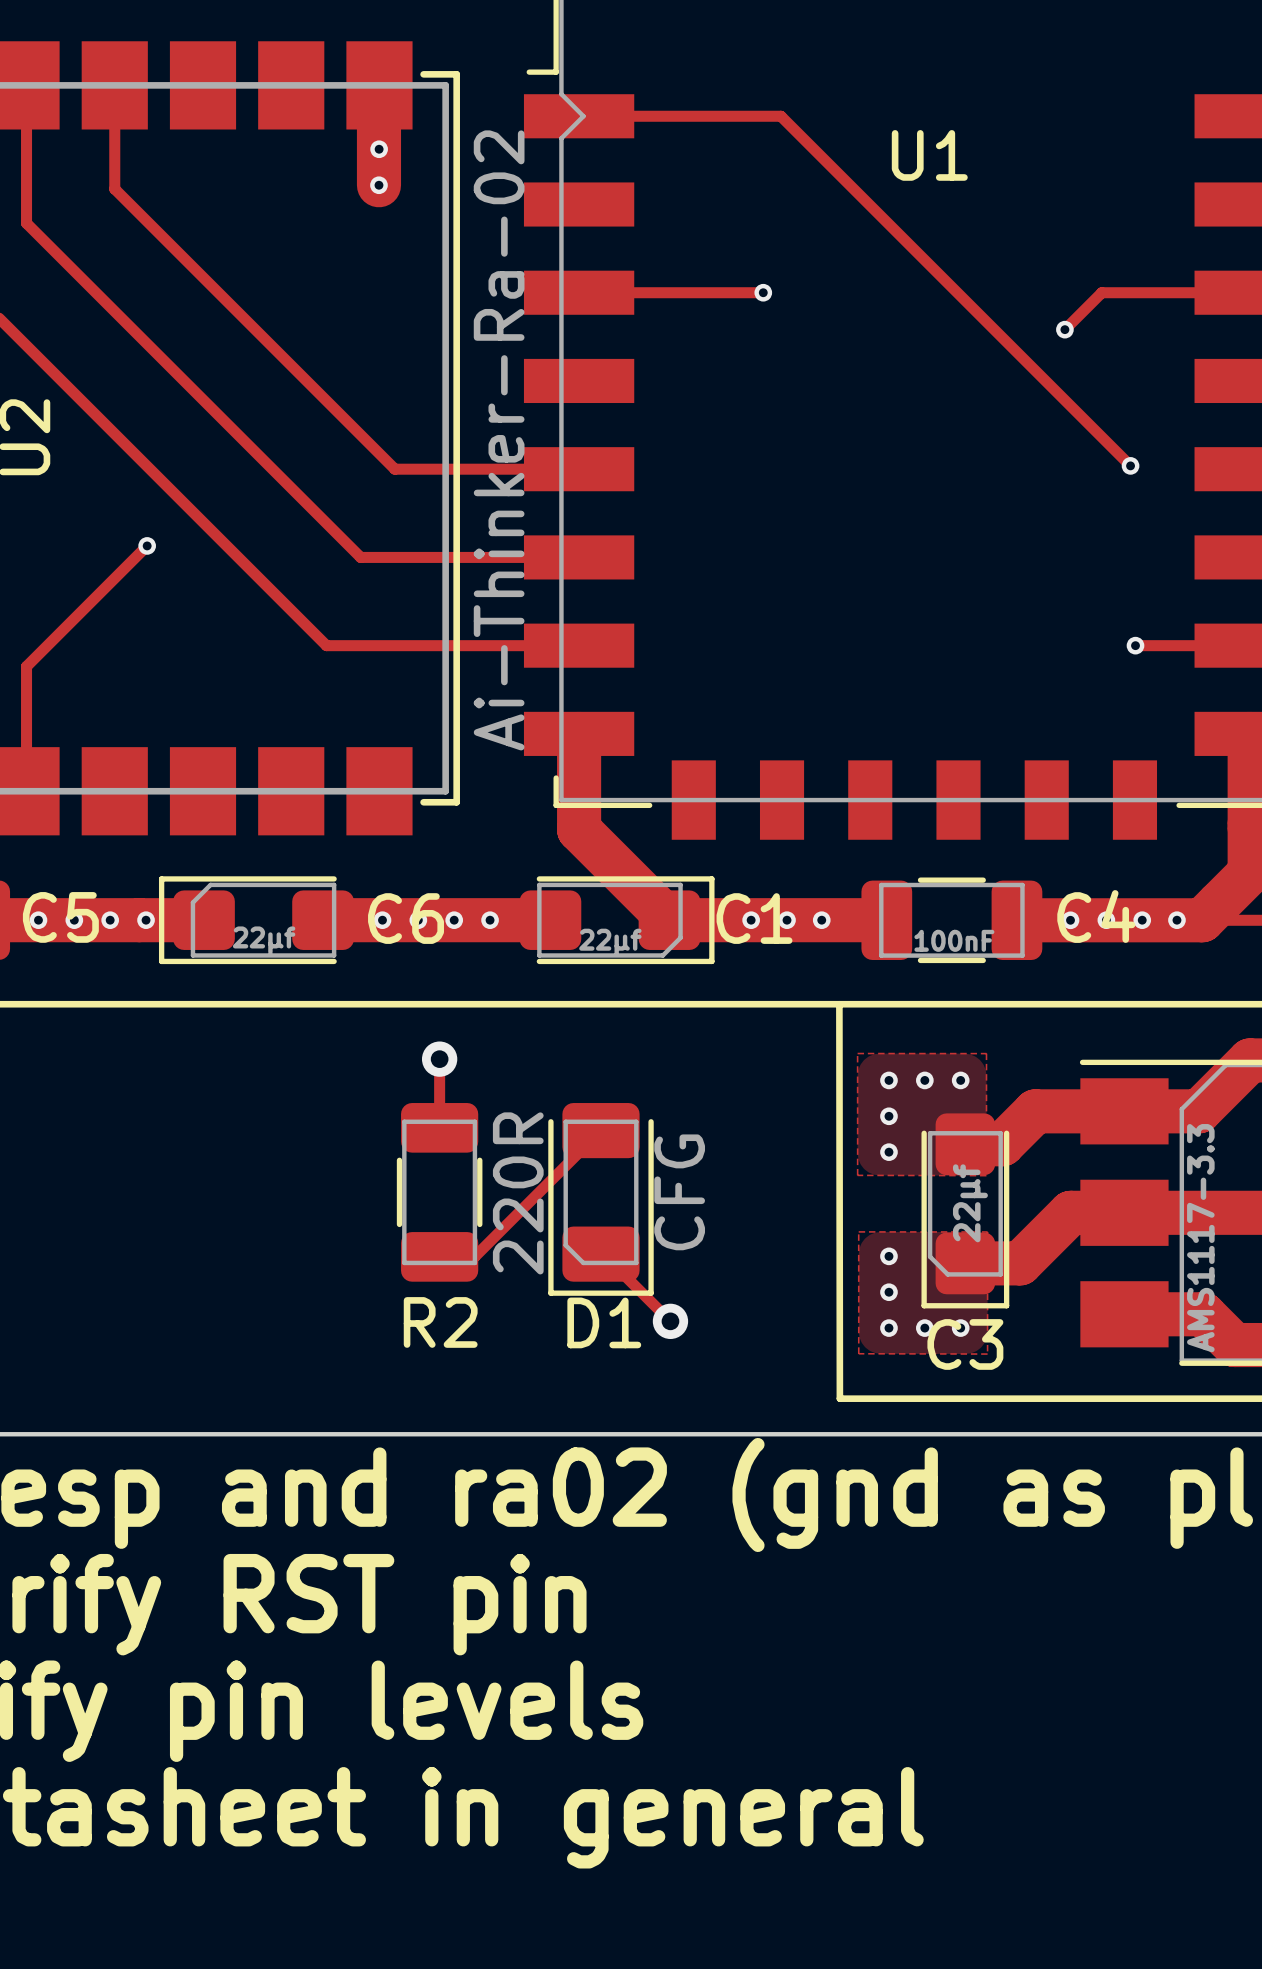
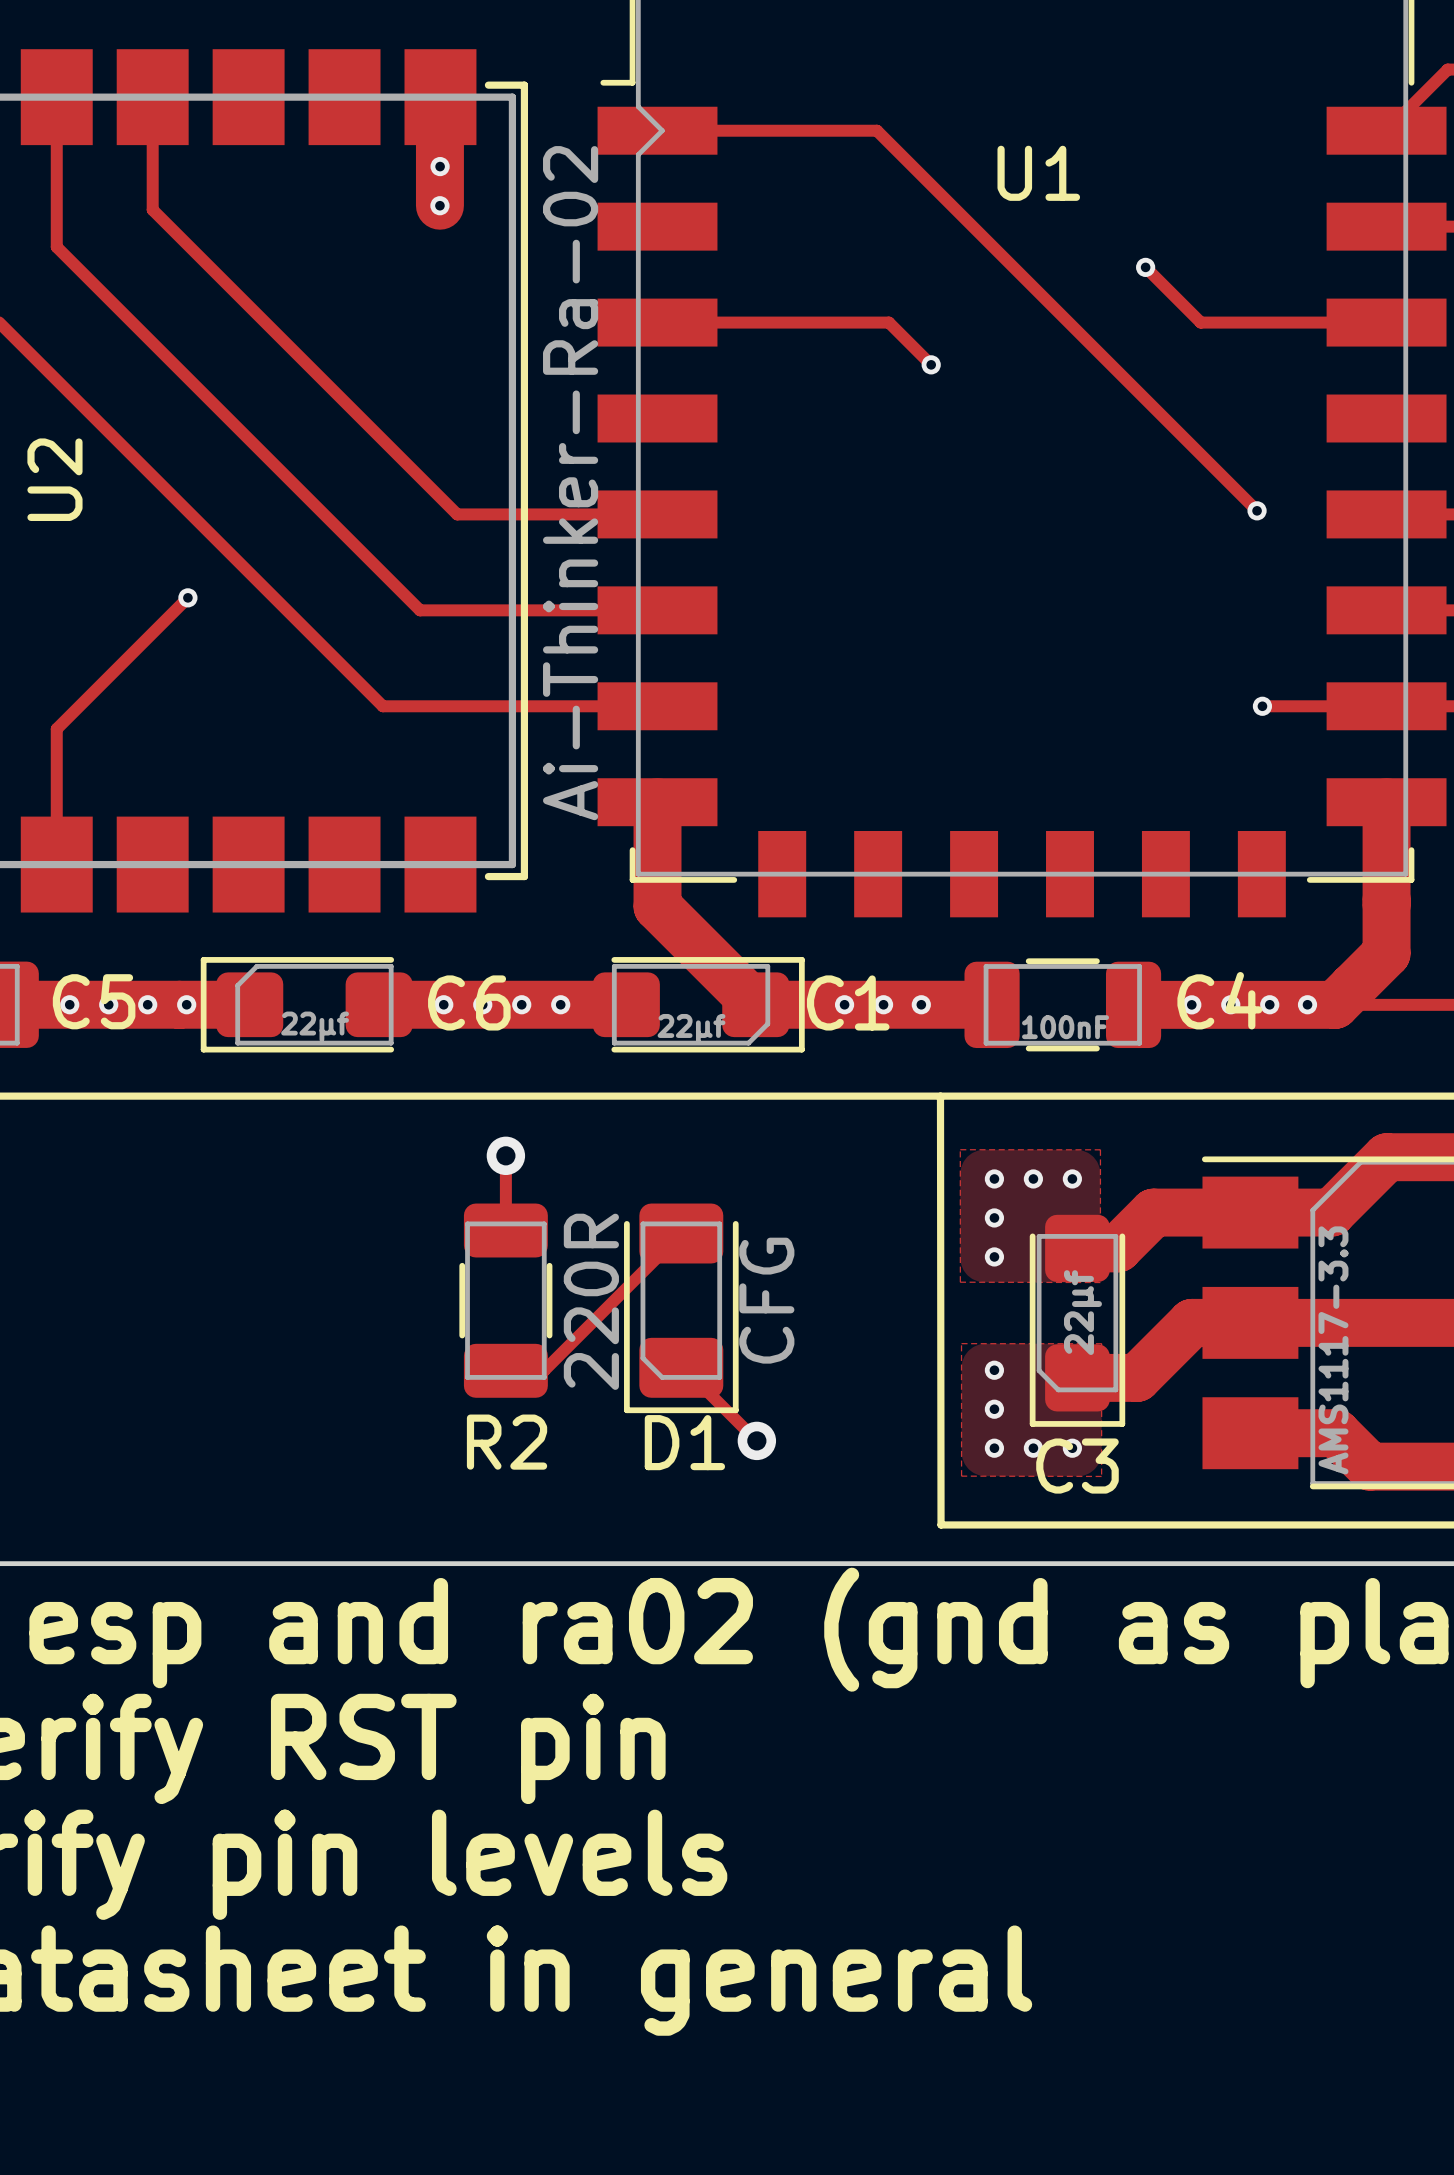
track: none -> (857, 322) (888, 322) (931, 364)
via position: (763, 292) -> (931, 364)
track: (1101, 292) (1064, 329) -> (1225, 322) (1200, 322) (1145, 267)
via position: (1064, 329) -> (1145, 267)

